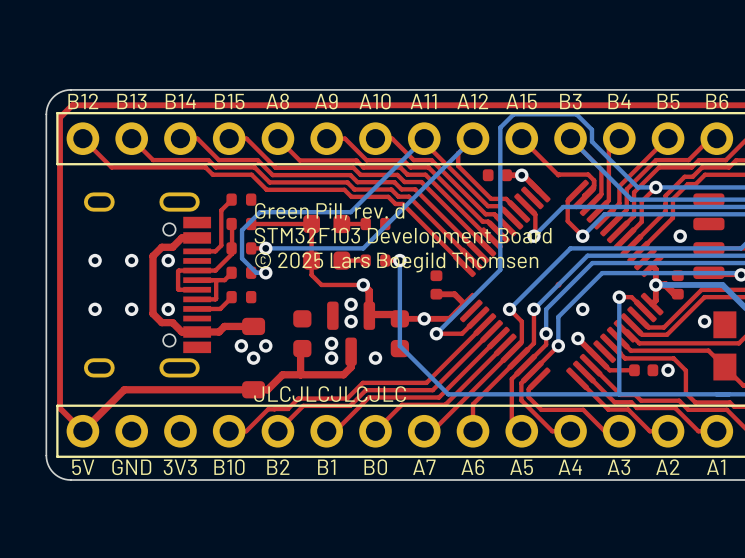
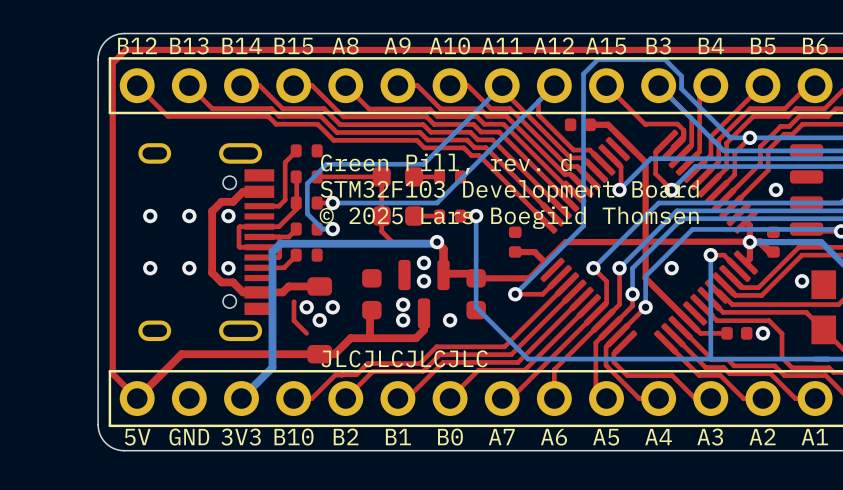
via: (521, 175) -> none
top track: none -> (625, 141) (645, 162) (645, 278) (666, 299)
top track: none -> (645, 242) (565, 242) (545, 262)
top track: none -> (749, 241) (646, 241)
bottom track: none -> (435, 243) (280, 243) (272, 251) (272, 367) (241, 398)
via: (424, 318) -> none
via: (577, 338) -> none
top track: none -> (293, 302) (293, 320) (306, 333)

